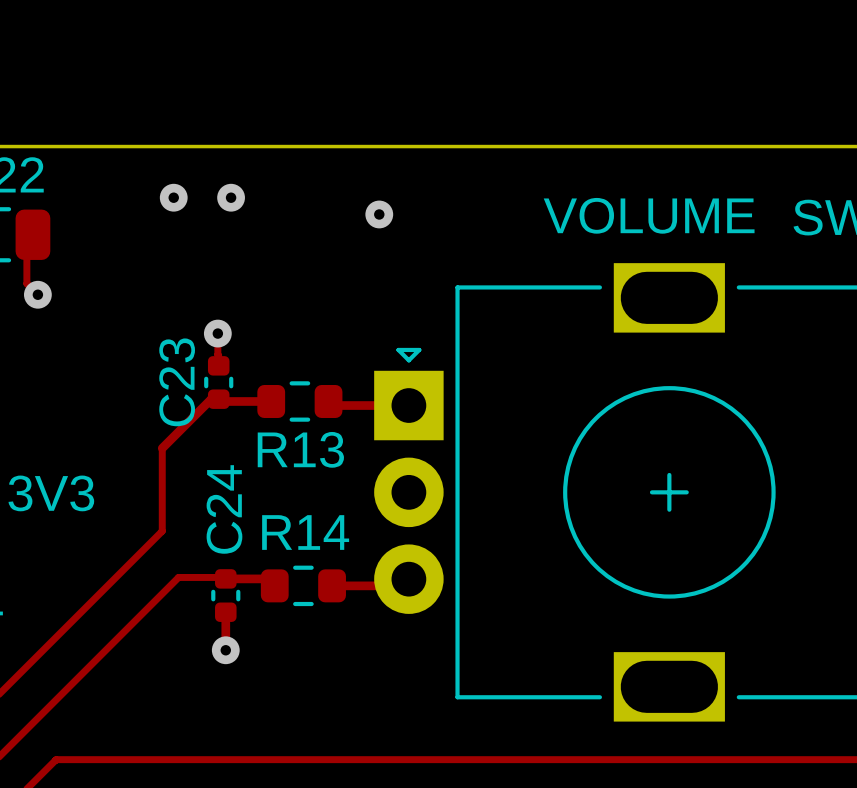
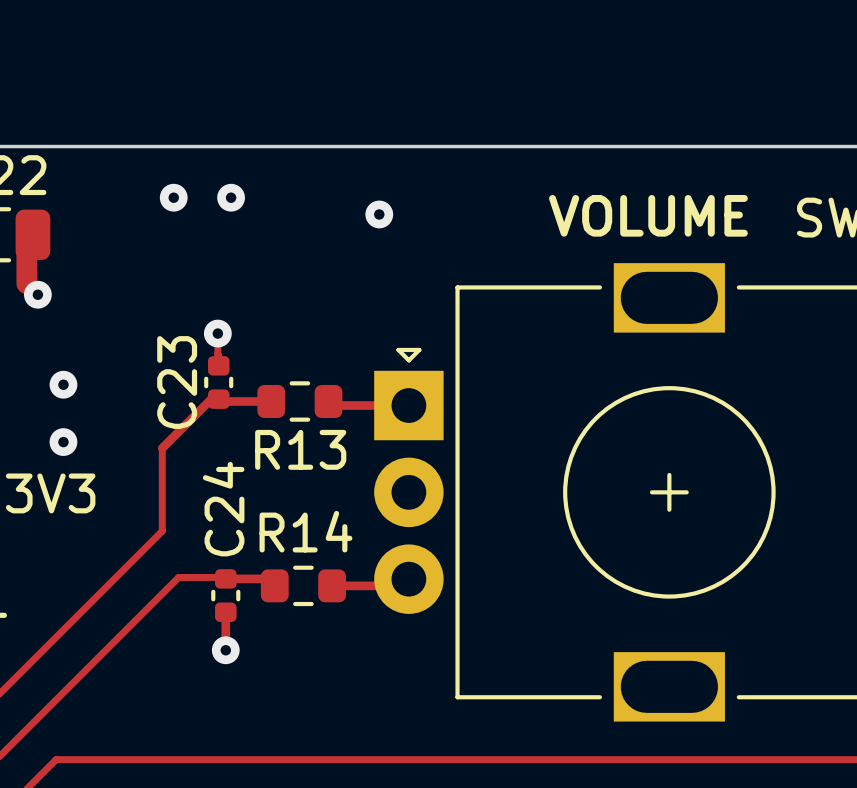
track width: thin (26, 234) (26, 283) -> thick (26, 234) (26, 283)
via: none -> (63, 384)
via: none -> (63, 442)

